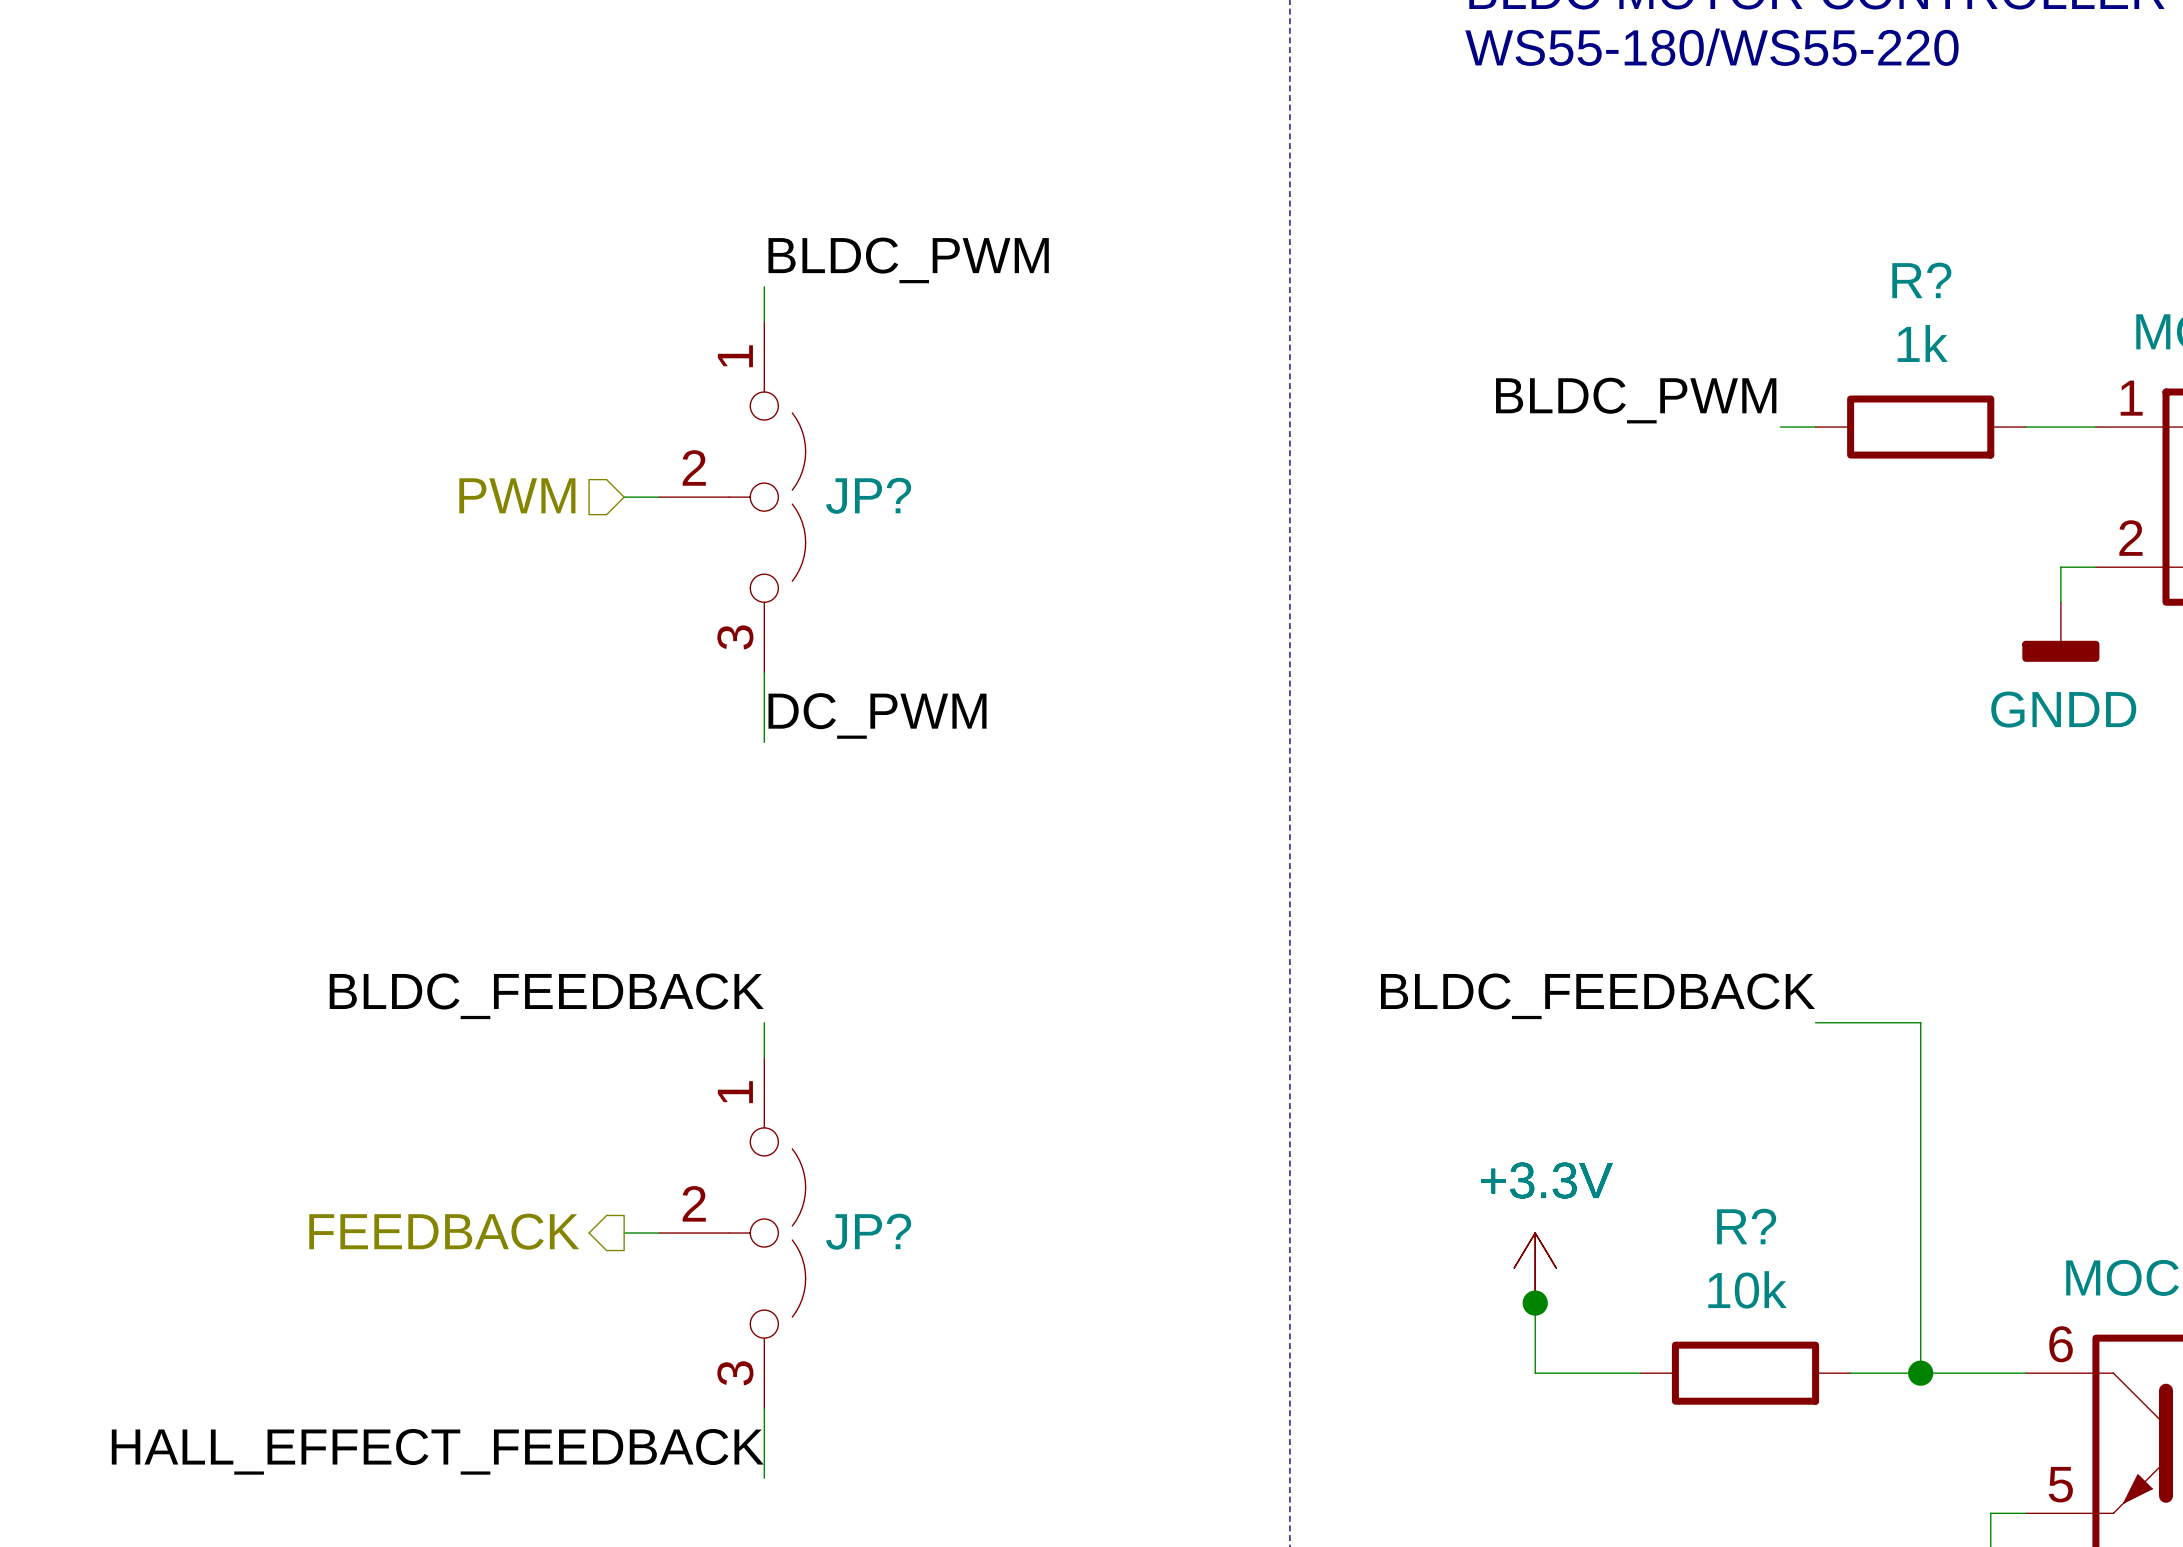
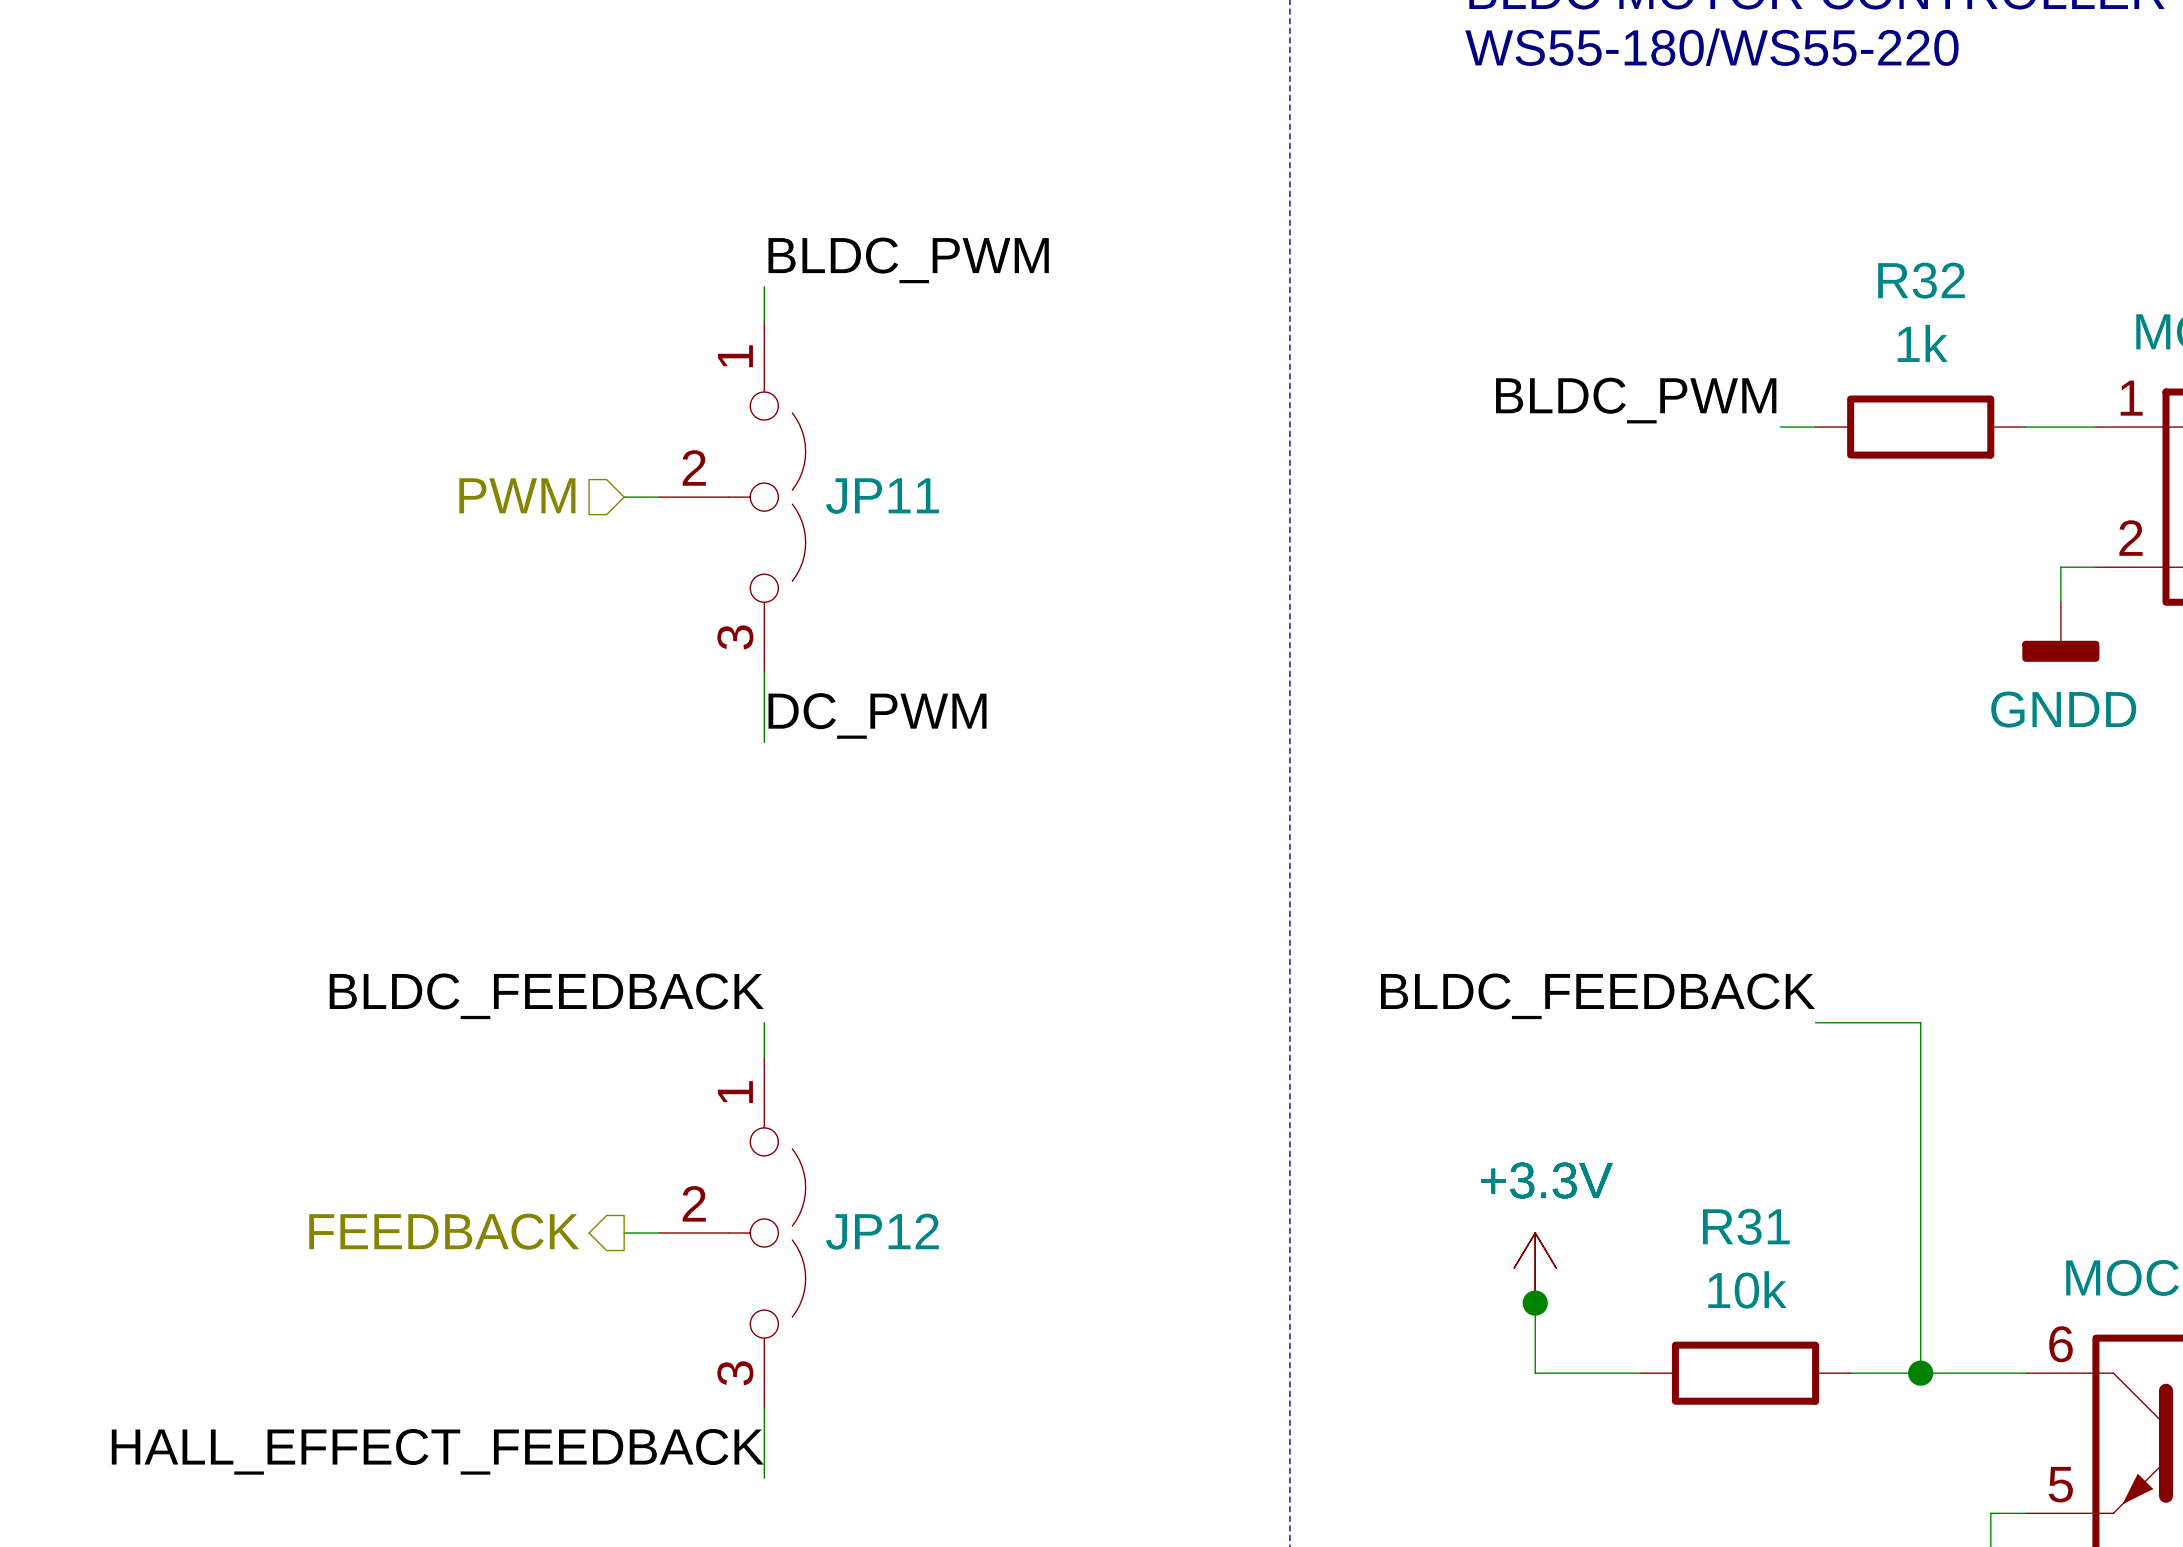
R? name: R? (1921, 280) -> R32 (1921, 280)
JP? name: JP? (868, 495) -> JP11 (882, 496)
R? name: R? (1746, 1226) -> R31 (1746, 1226)
JP? name: JP? (868, 1231) -> JP12 (882, 1231)

